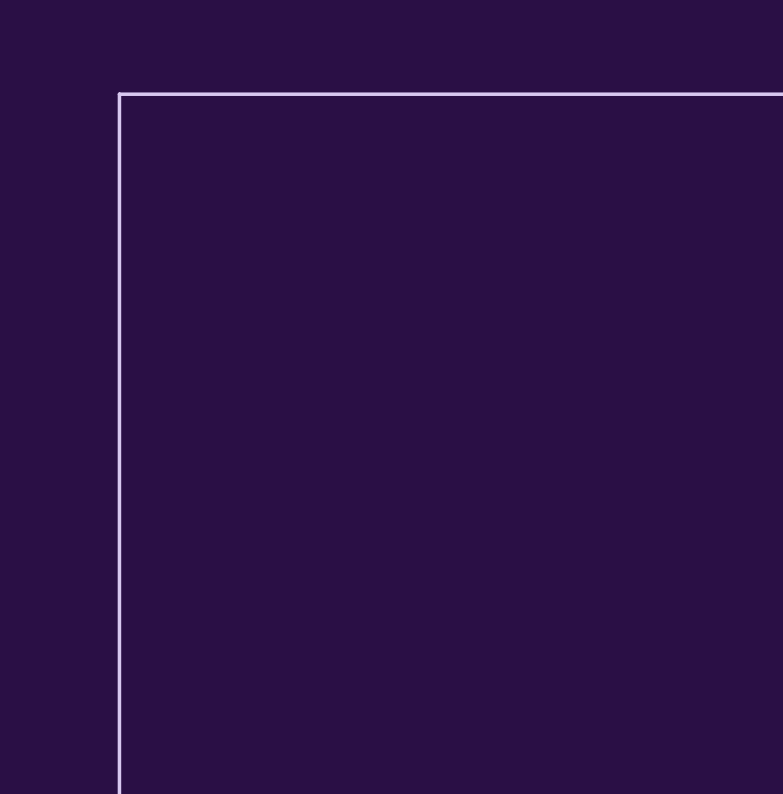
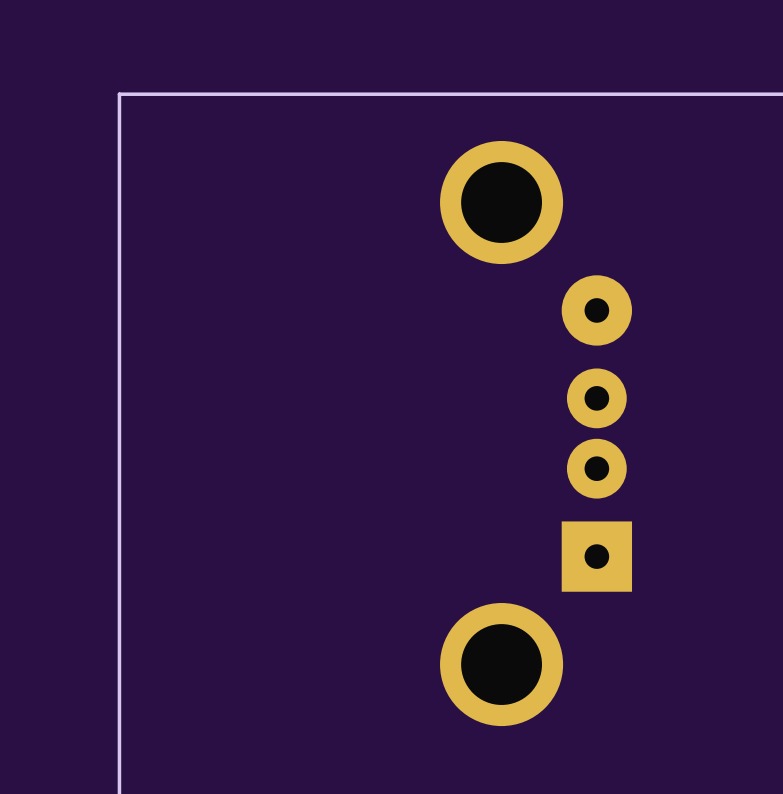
part: none -> (536, 433)

